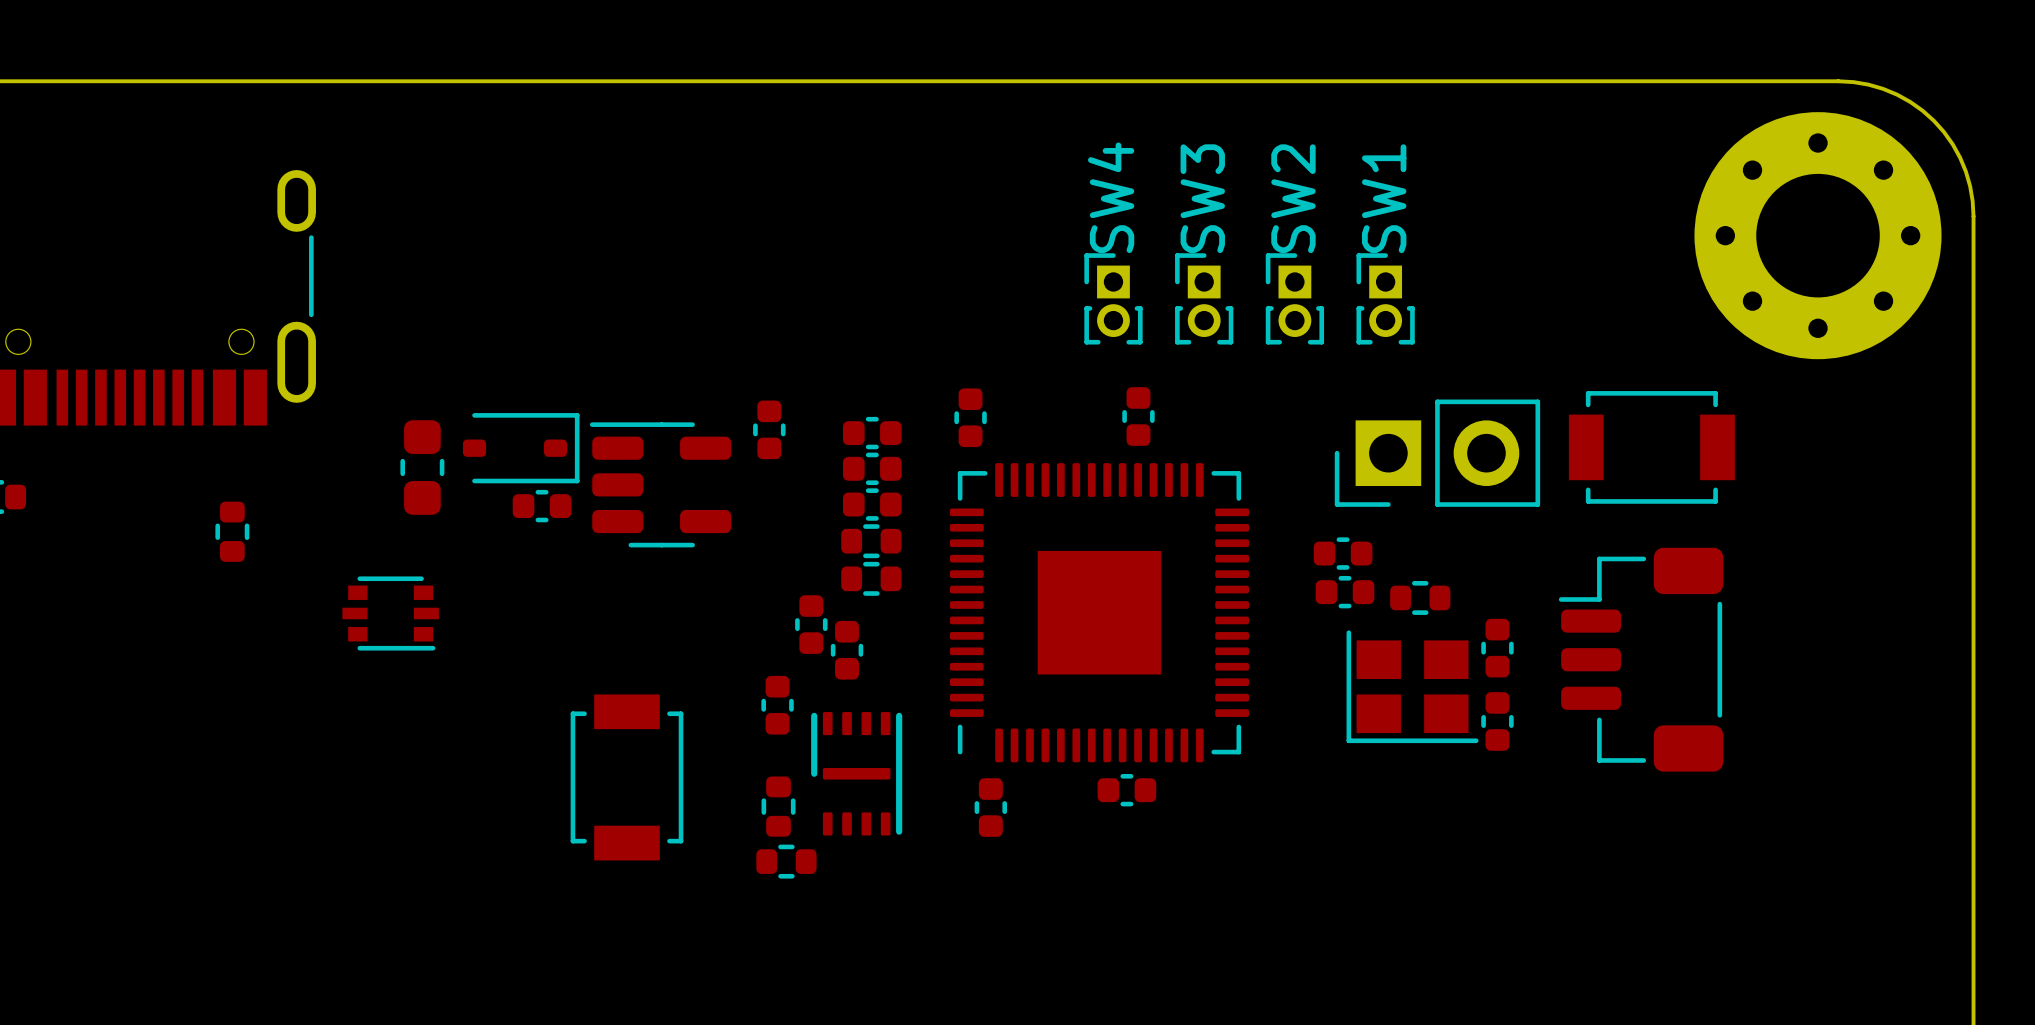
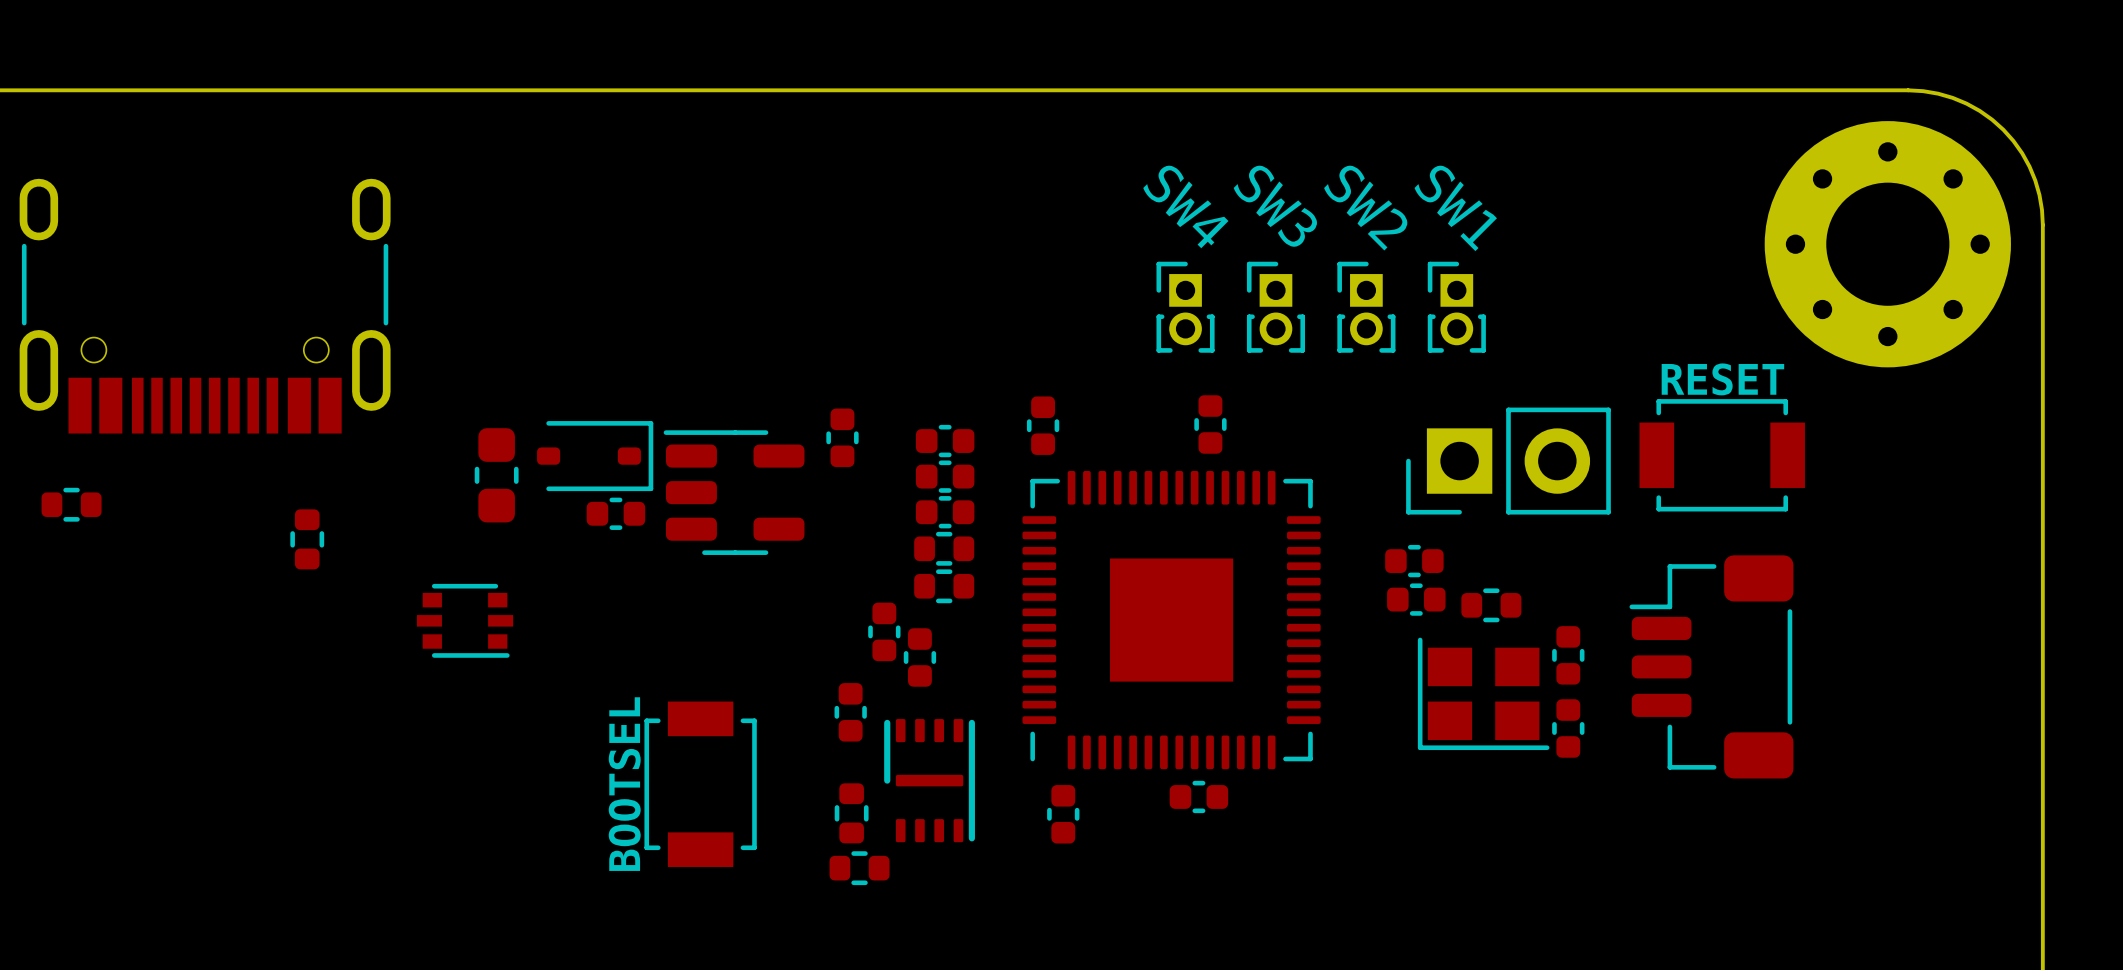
SW4 name rotation: 0° (1111, 197) -> 135° clockwise (1185, 206)
SW3 name rotation: 0° (1202, 198) -> 135° clockwise (1275, 206)
SW2 name rotation: 0° (1293, 198) -> 135° clockwise (1365, 207)
SW1 name rotation: 0° (1384, 198) -> 135° clockwise (1455, 208)
text: none -> RESET (1722, 379)
text: none -> BOOTSEL (624, 784)

